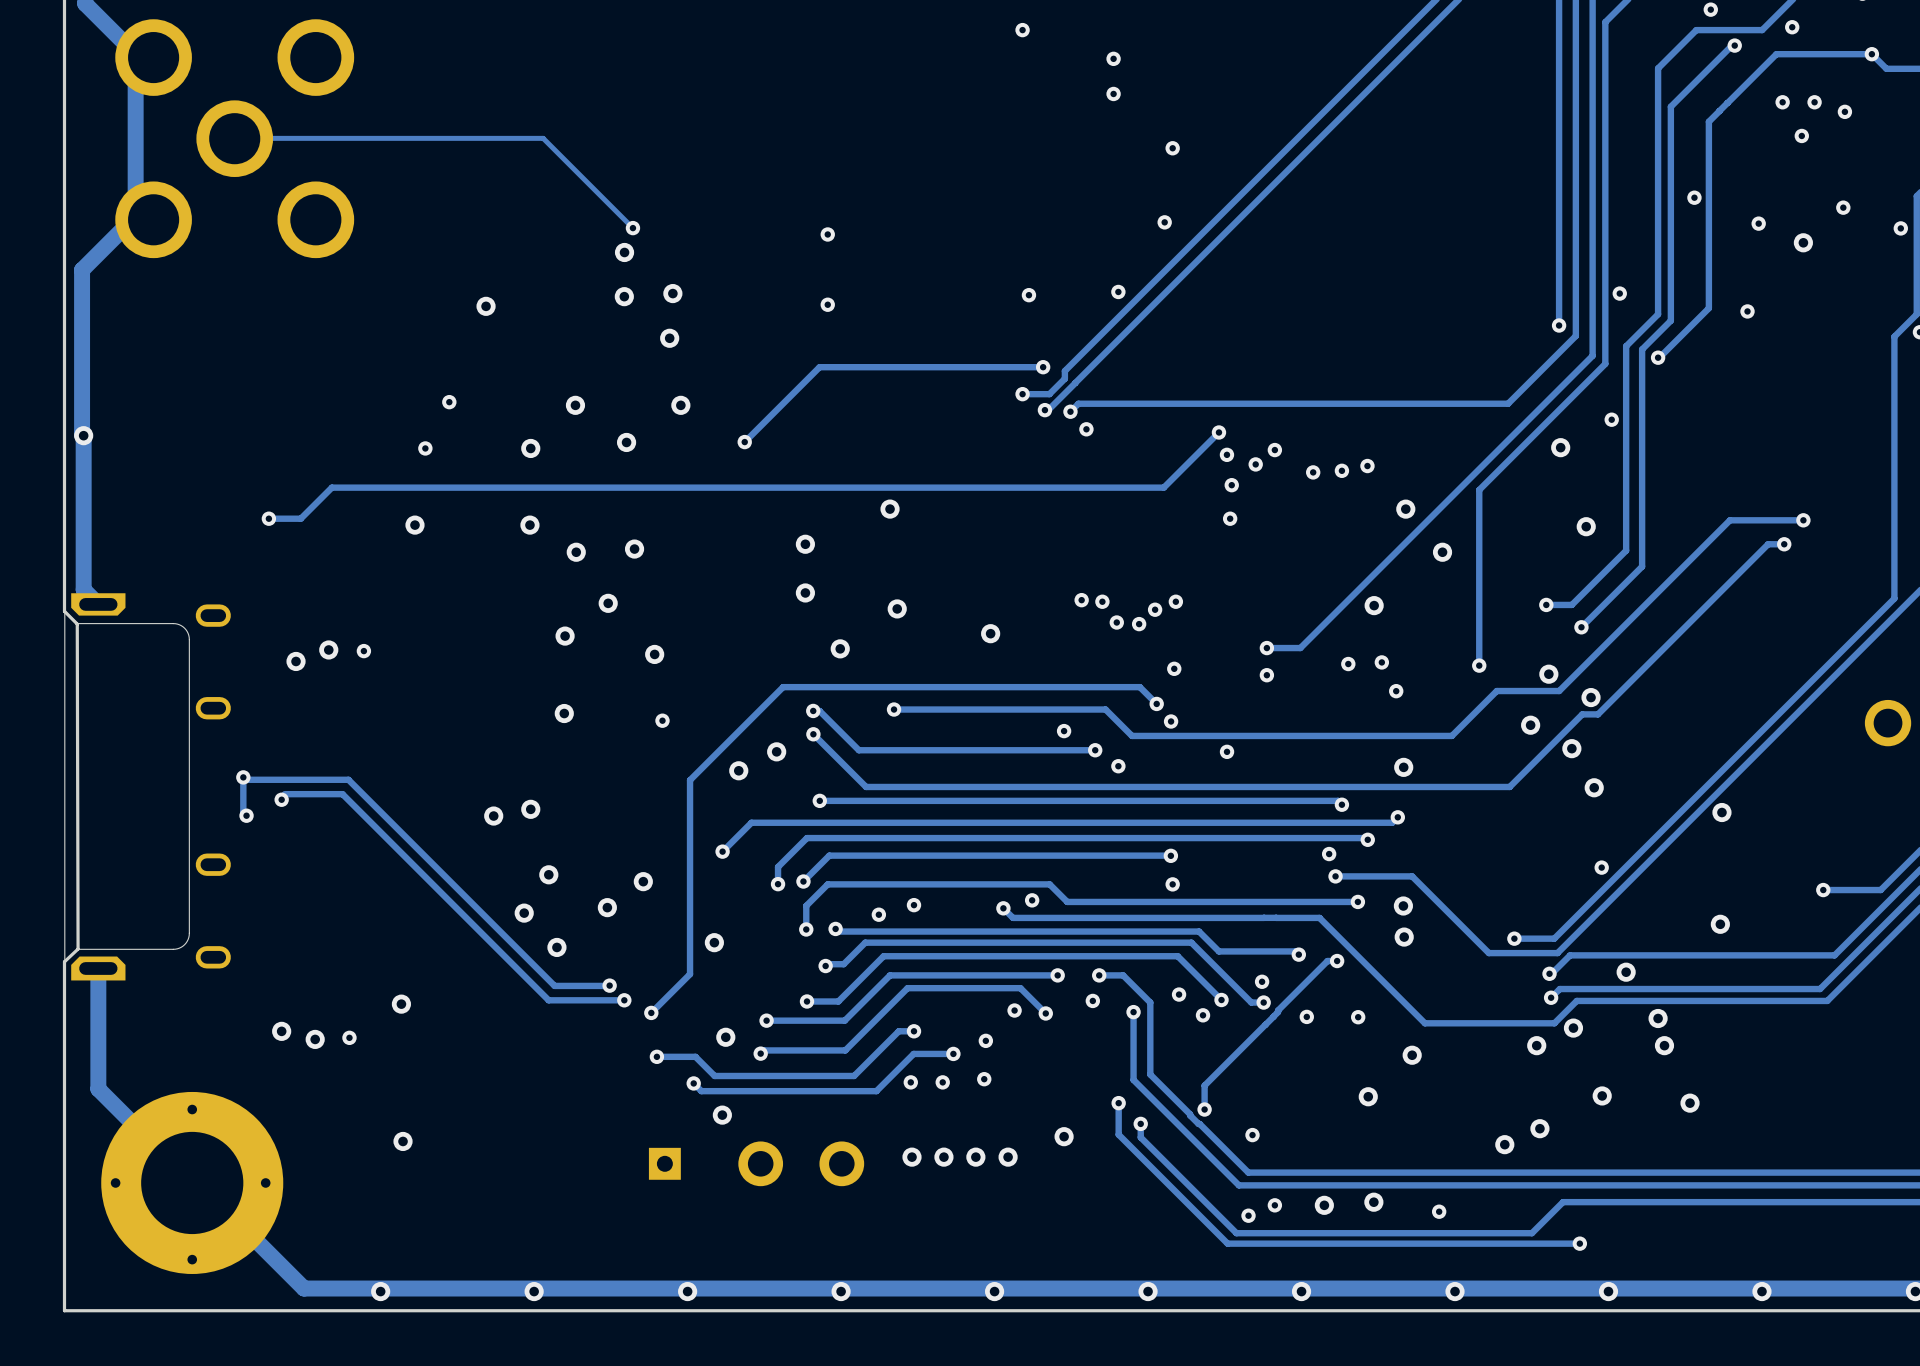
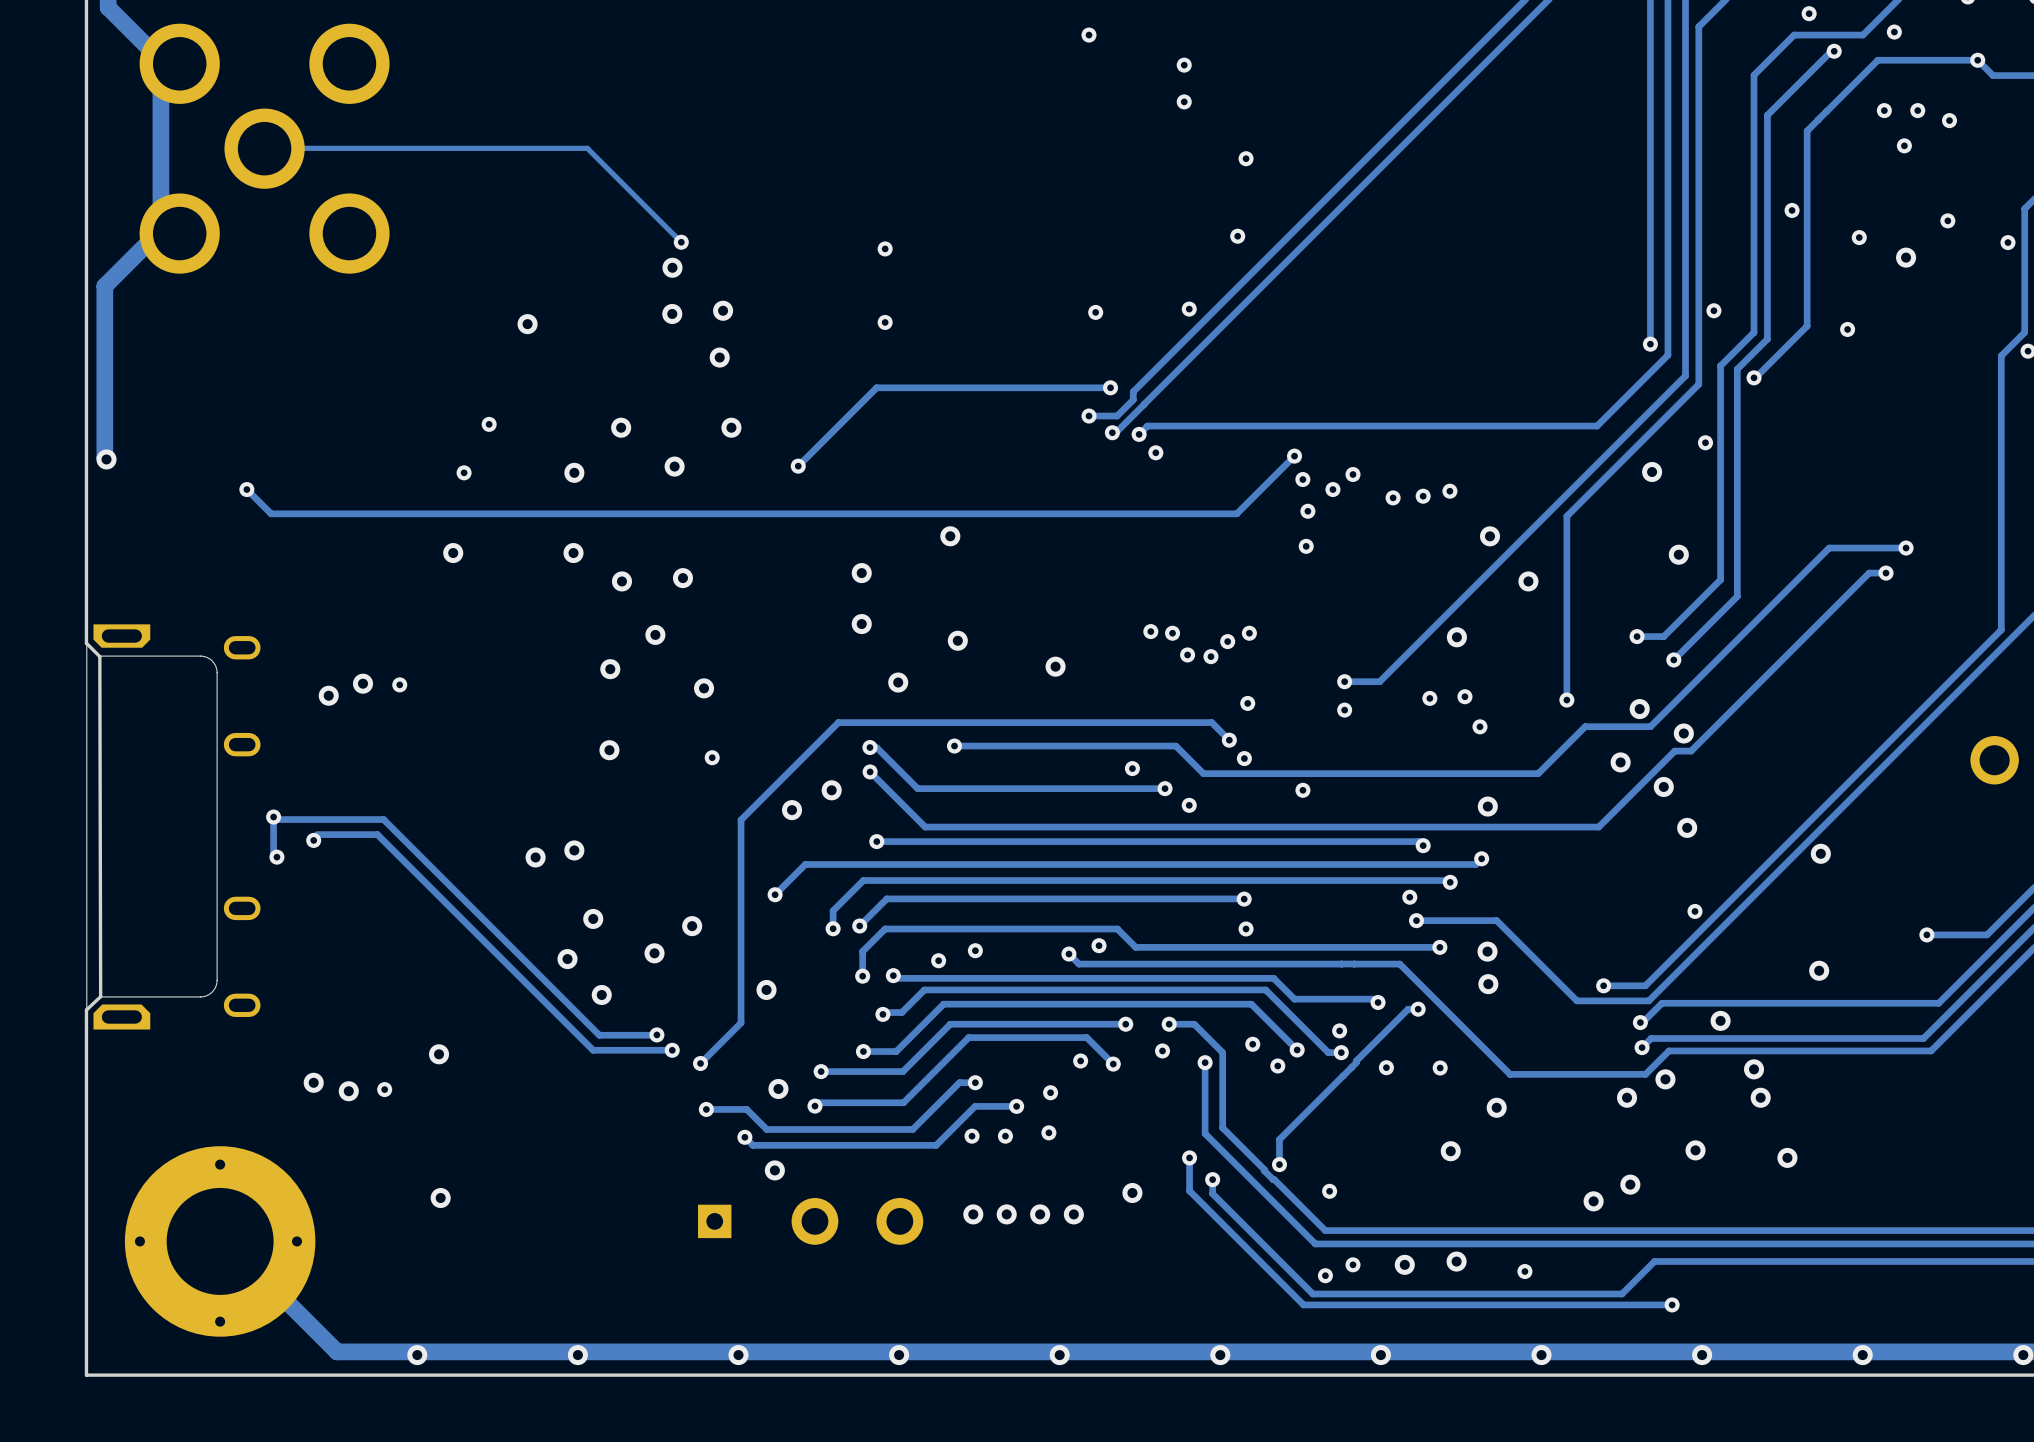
track: (83, 435) (83, 589) (98, 604) -> none
track: (331, 487) (300, 518) (268, 518) -> (366, 513) (271, 513) (246, 489)
via position: (268, 518) -> (246, 489)
track: (98, 968) (98, 1089) (192, 1182) -> none

